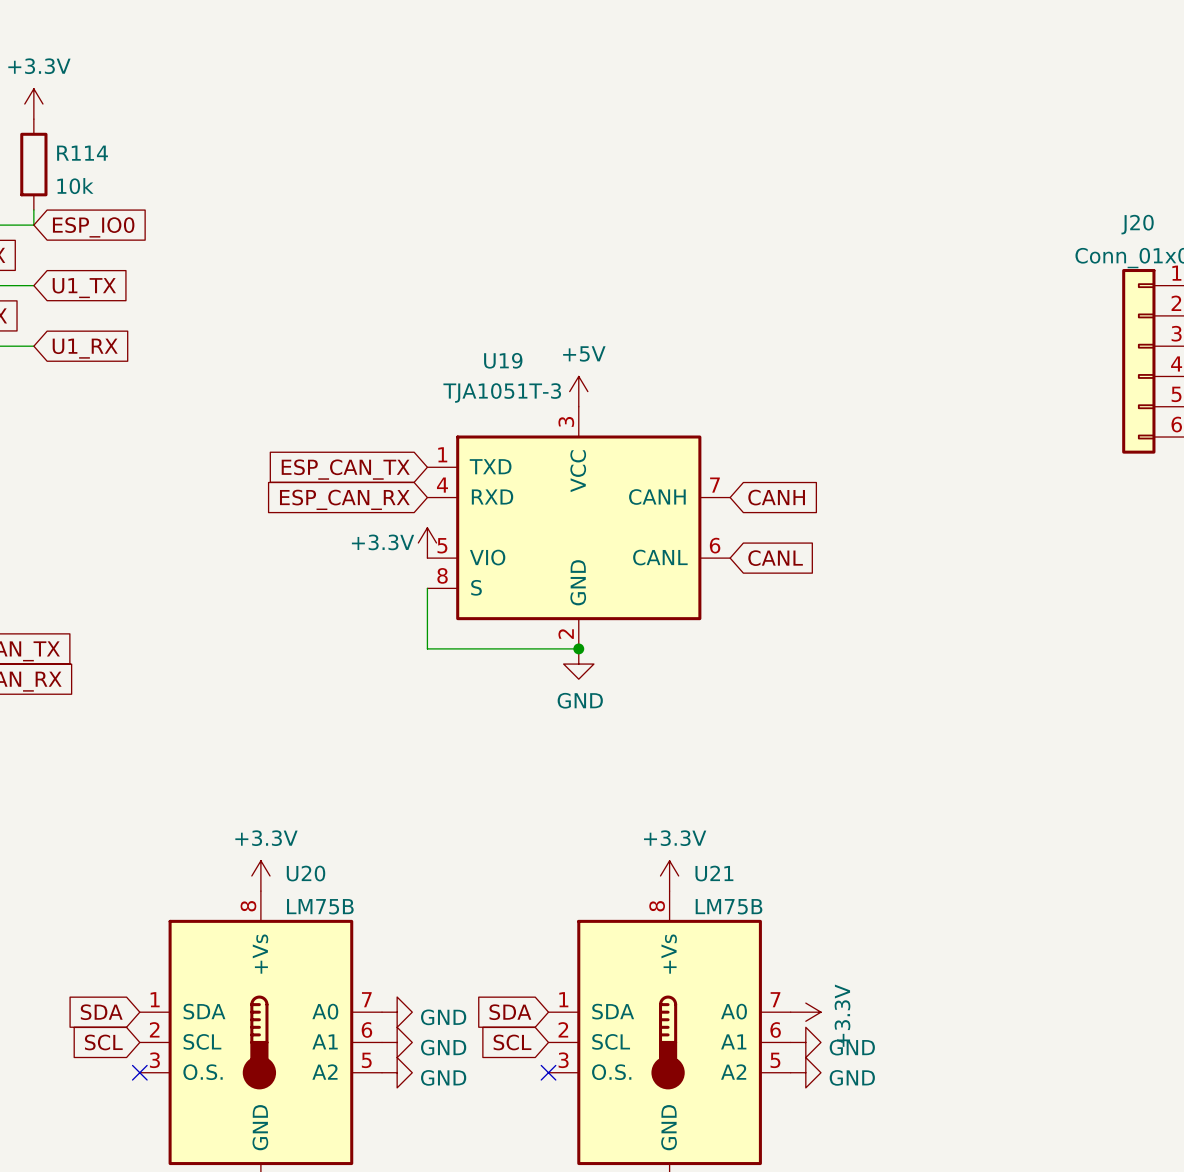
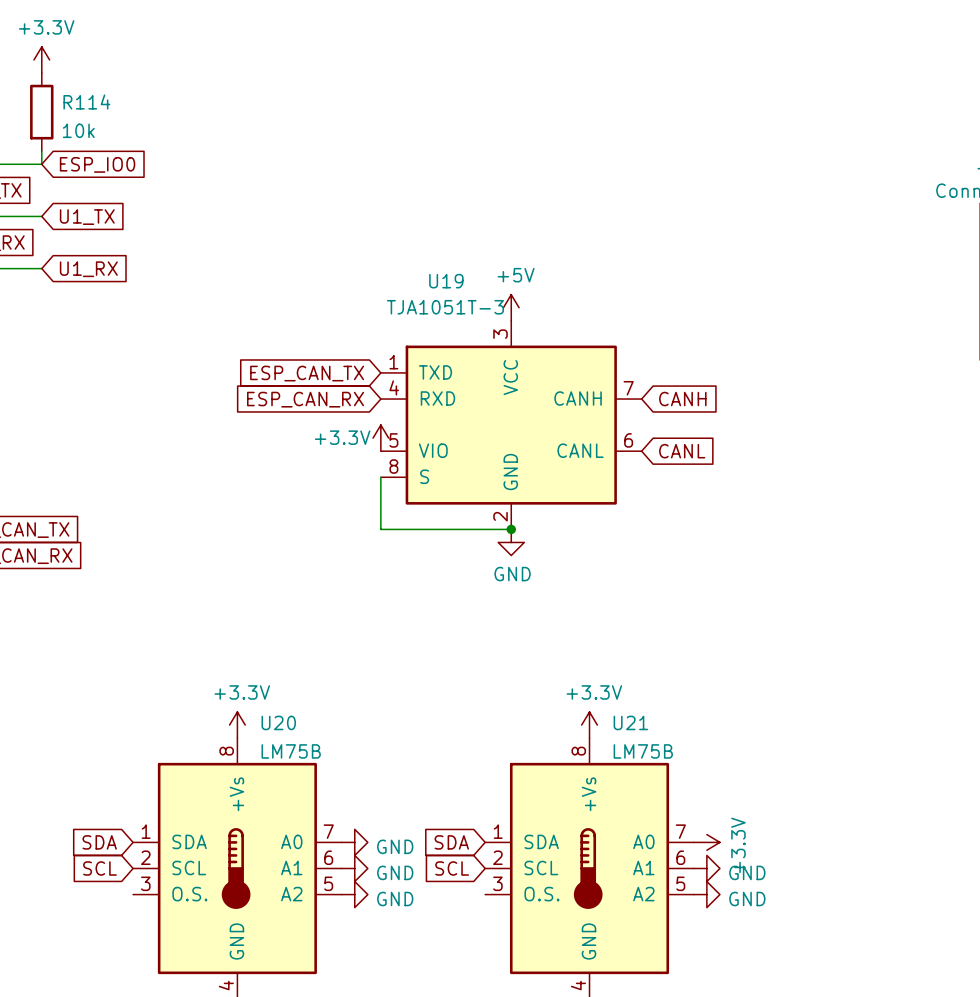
no-connect mark: (139, 1072) -> none
no-connect mark: (548, 1072) -> none

